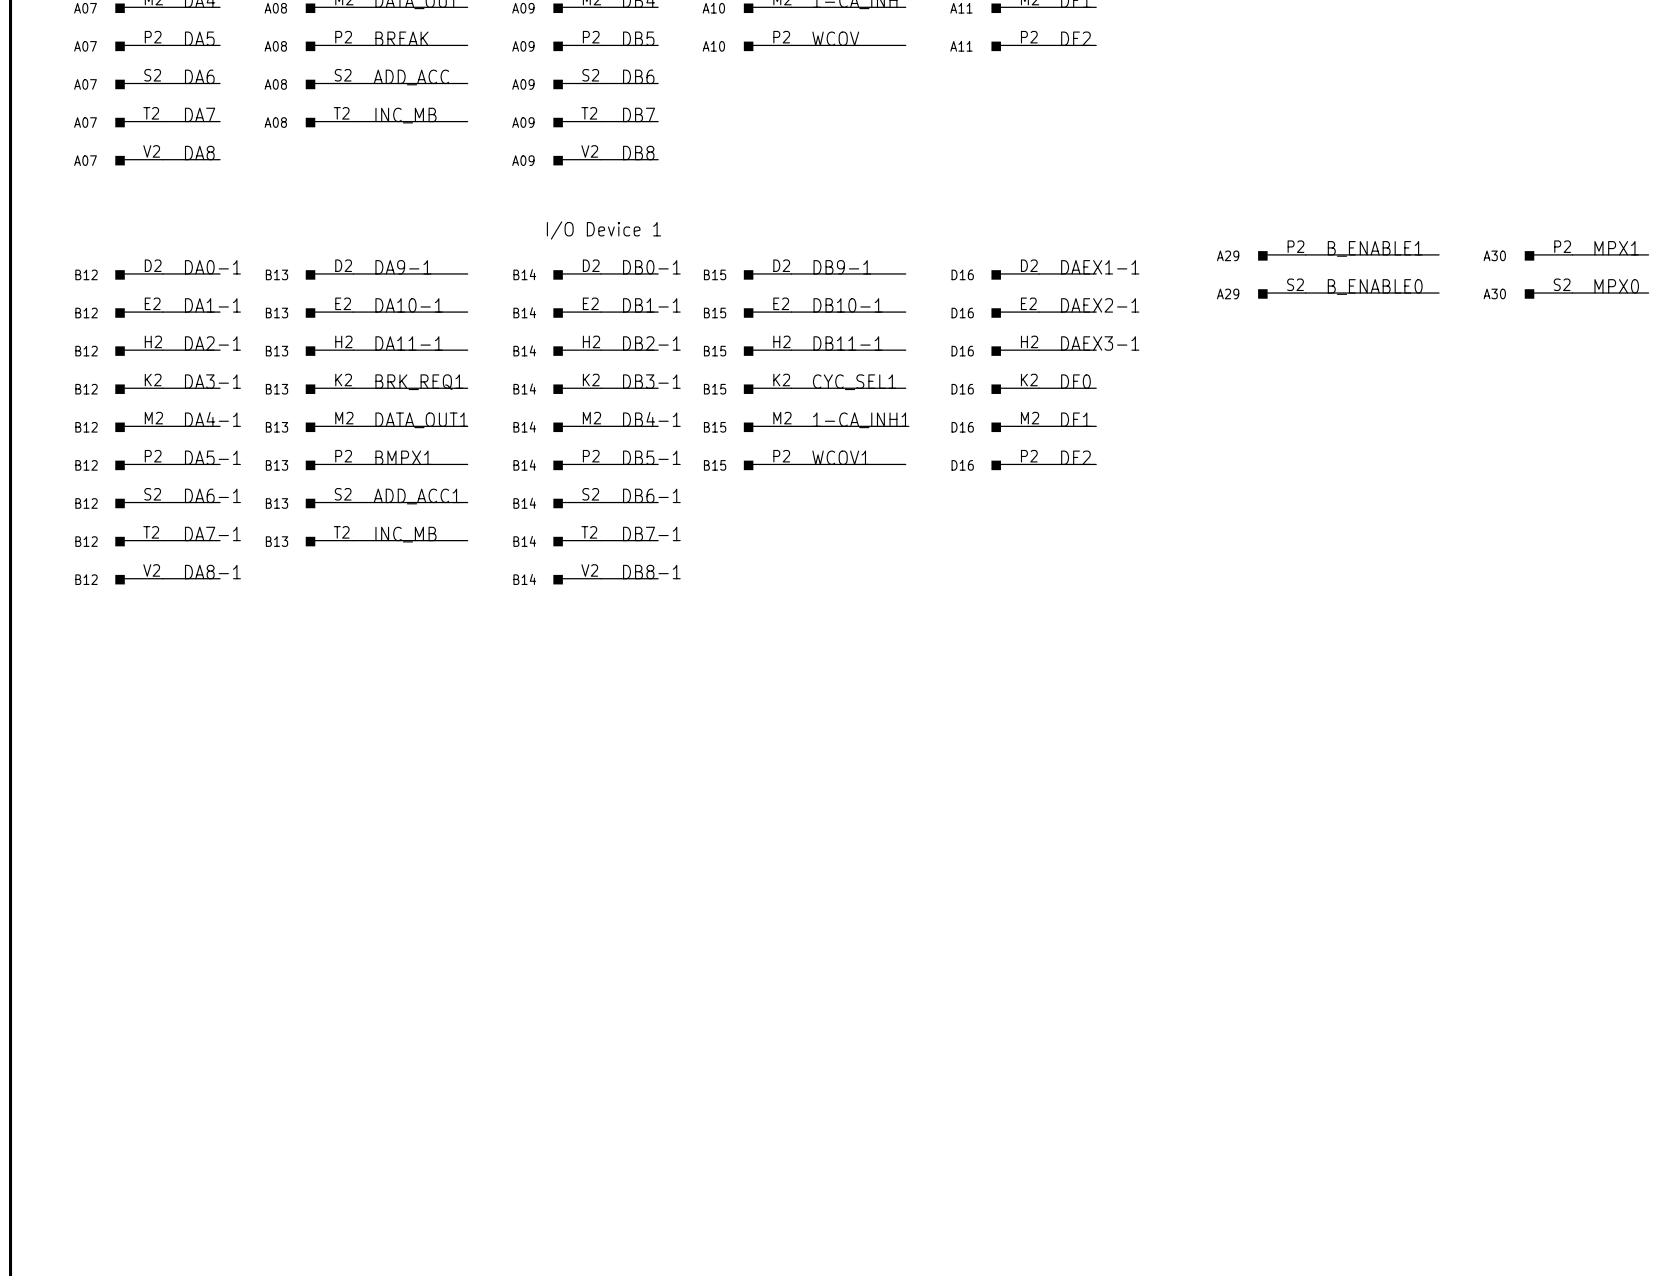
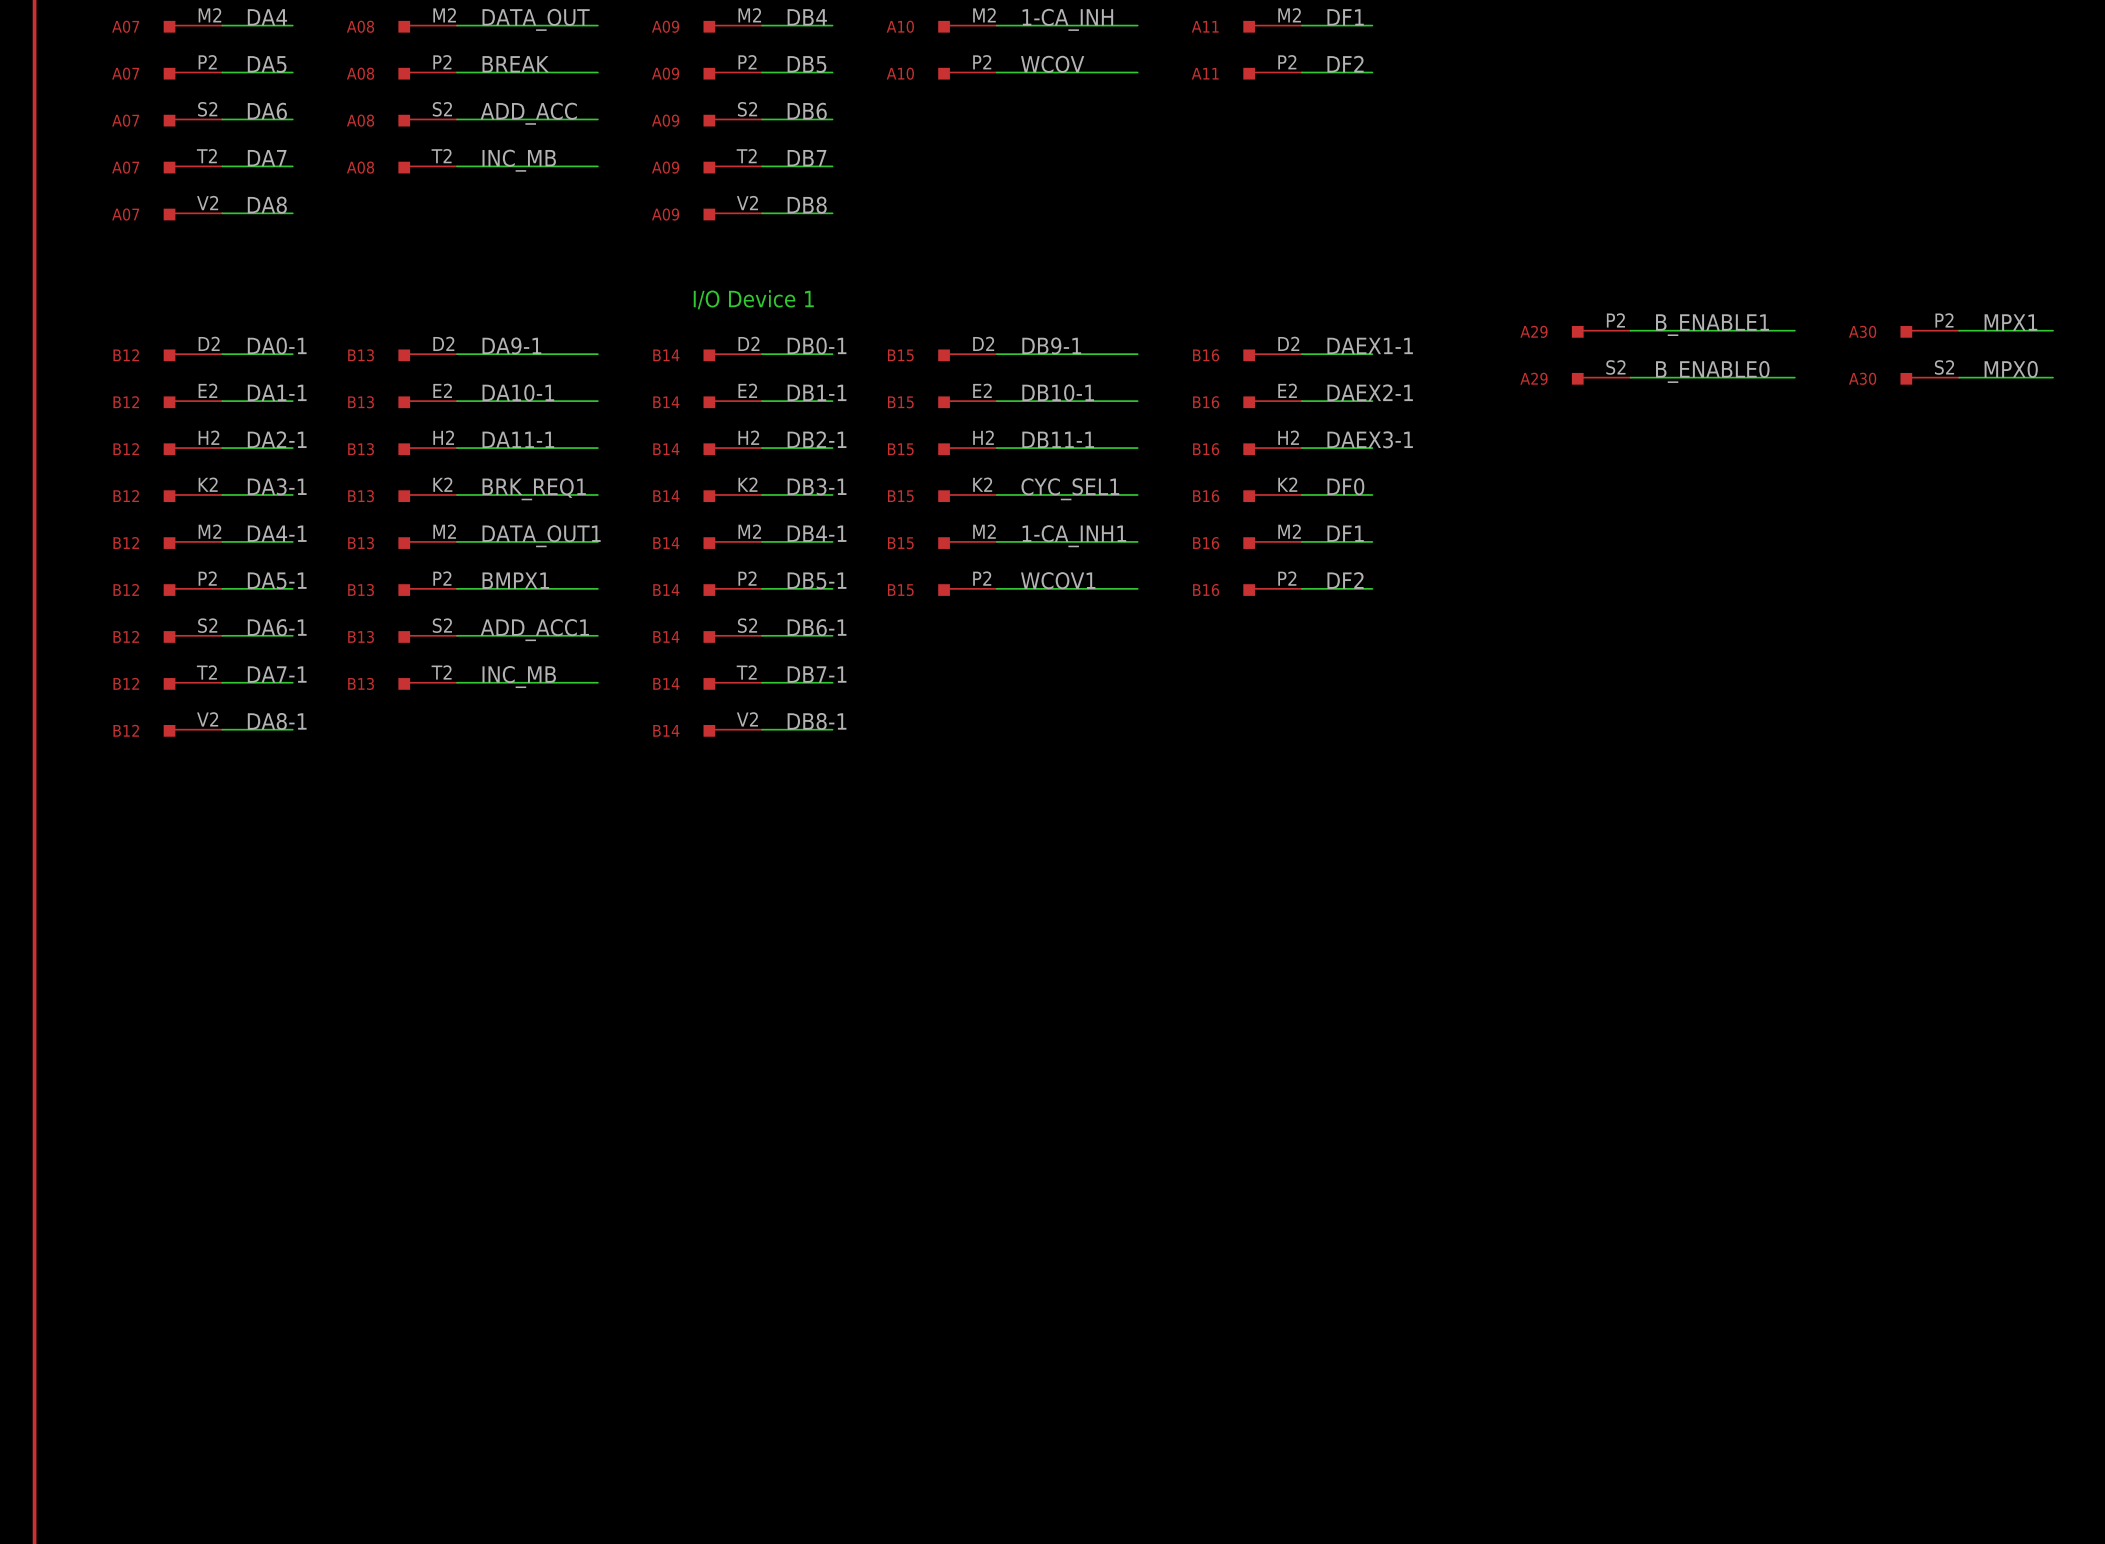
D16 name: D16 (962, 274) -> B16 (1206, 355)
D16 name: D16 (962, 313) -> B16 (1206, 402)
D16 name: D16 (962, 351) -> B16 (1206, 449)
D16 name: D16 (962, 389) -> B16 (1206, 496)
D16 name: D16 (962, 427) -> B16 (1206, 543)
D16 name: D16 (962, 465) -> B16 (1206, 590)

